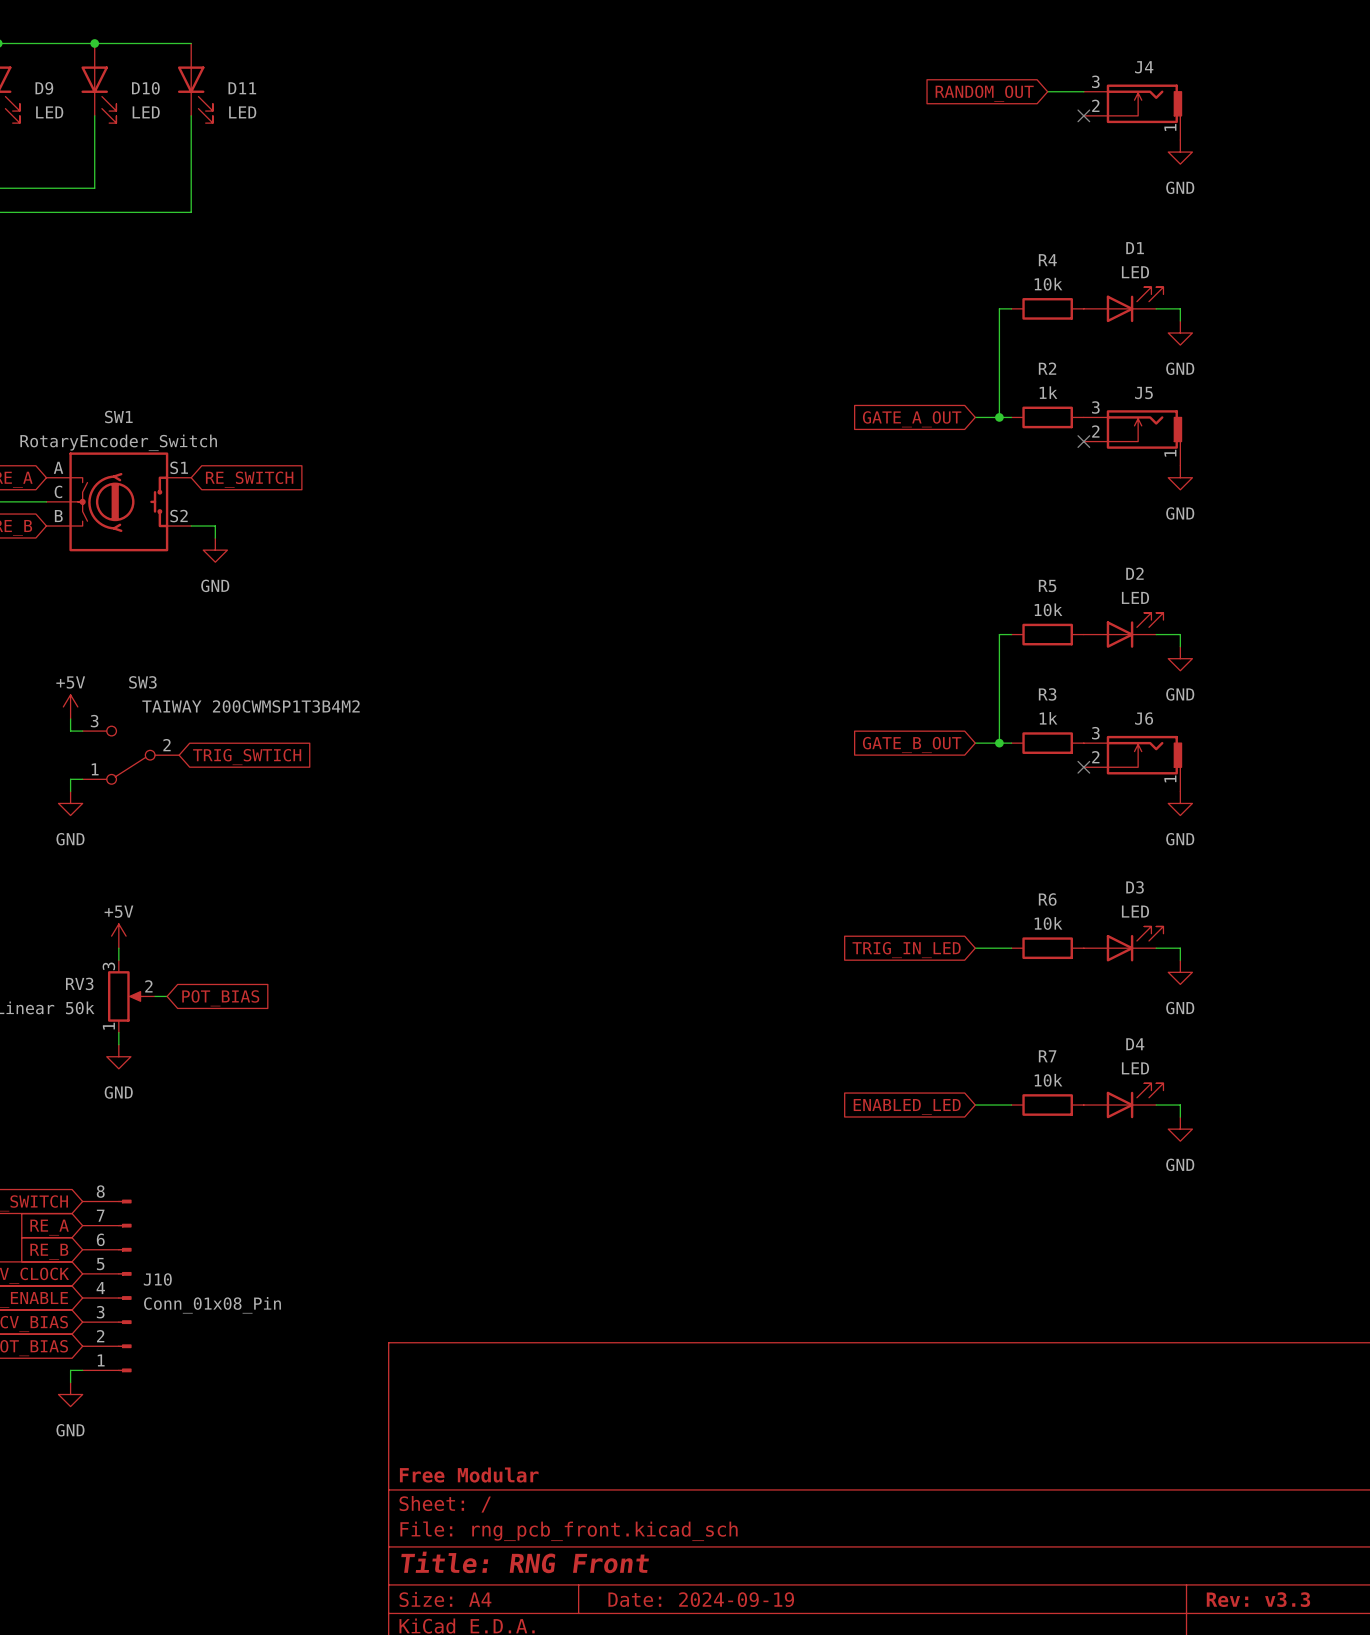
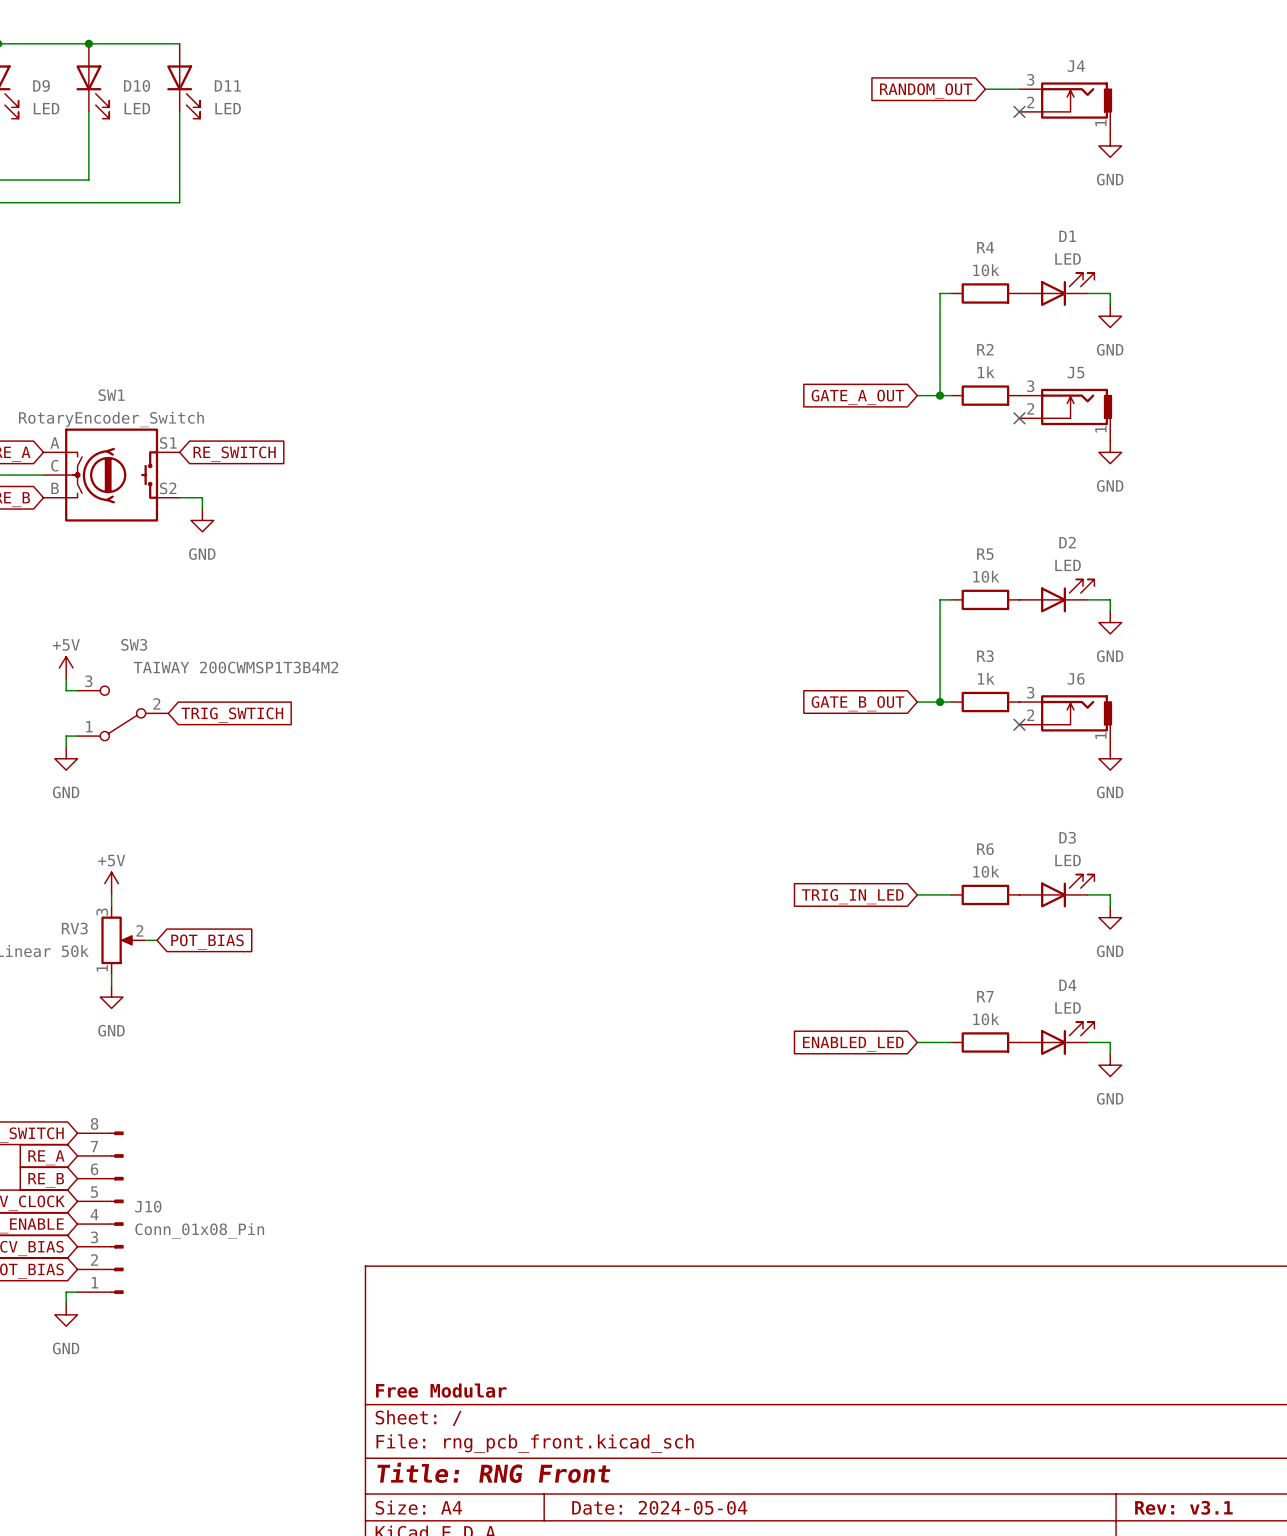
title block: Date: 2024-09-19 (701, 1599) -> Date: 2024-05-04 (659, 1507)
title block: Rev: v3.3 (1258, 1599) -> Rev: v3.1 (1183, 1507)

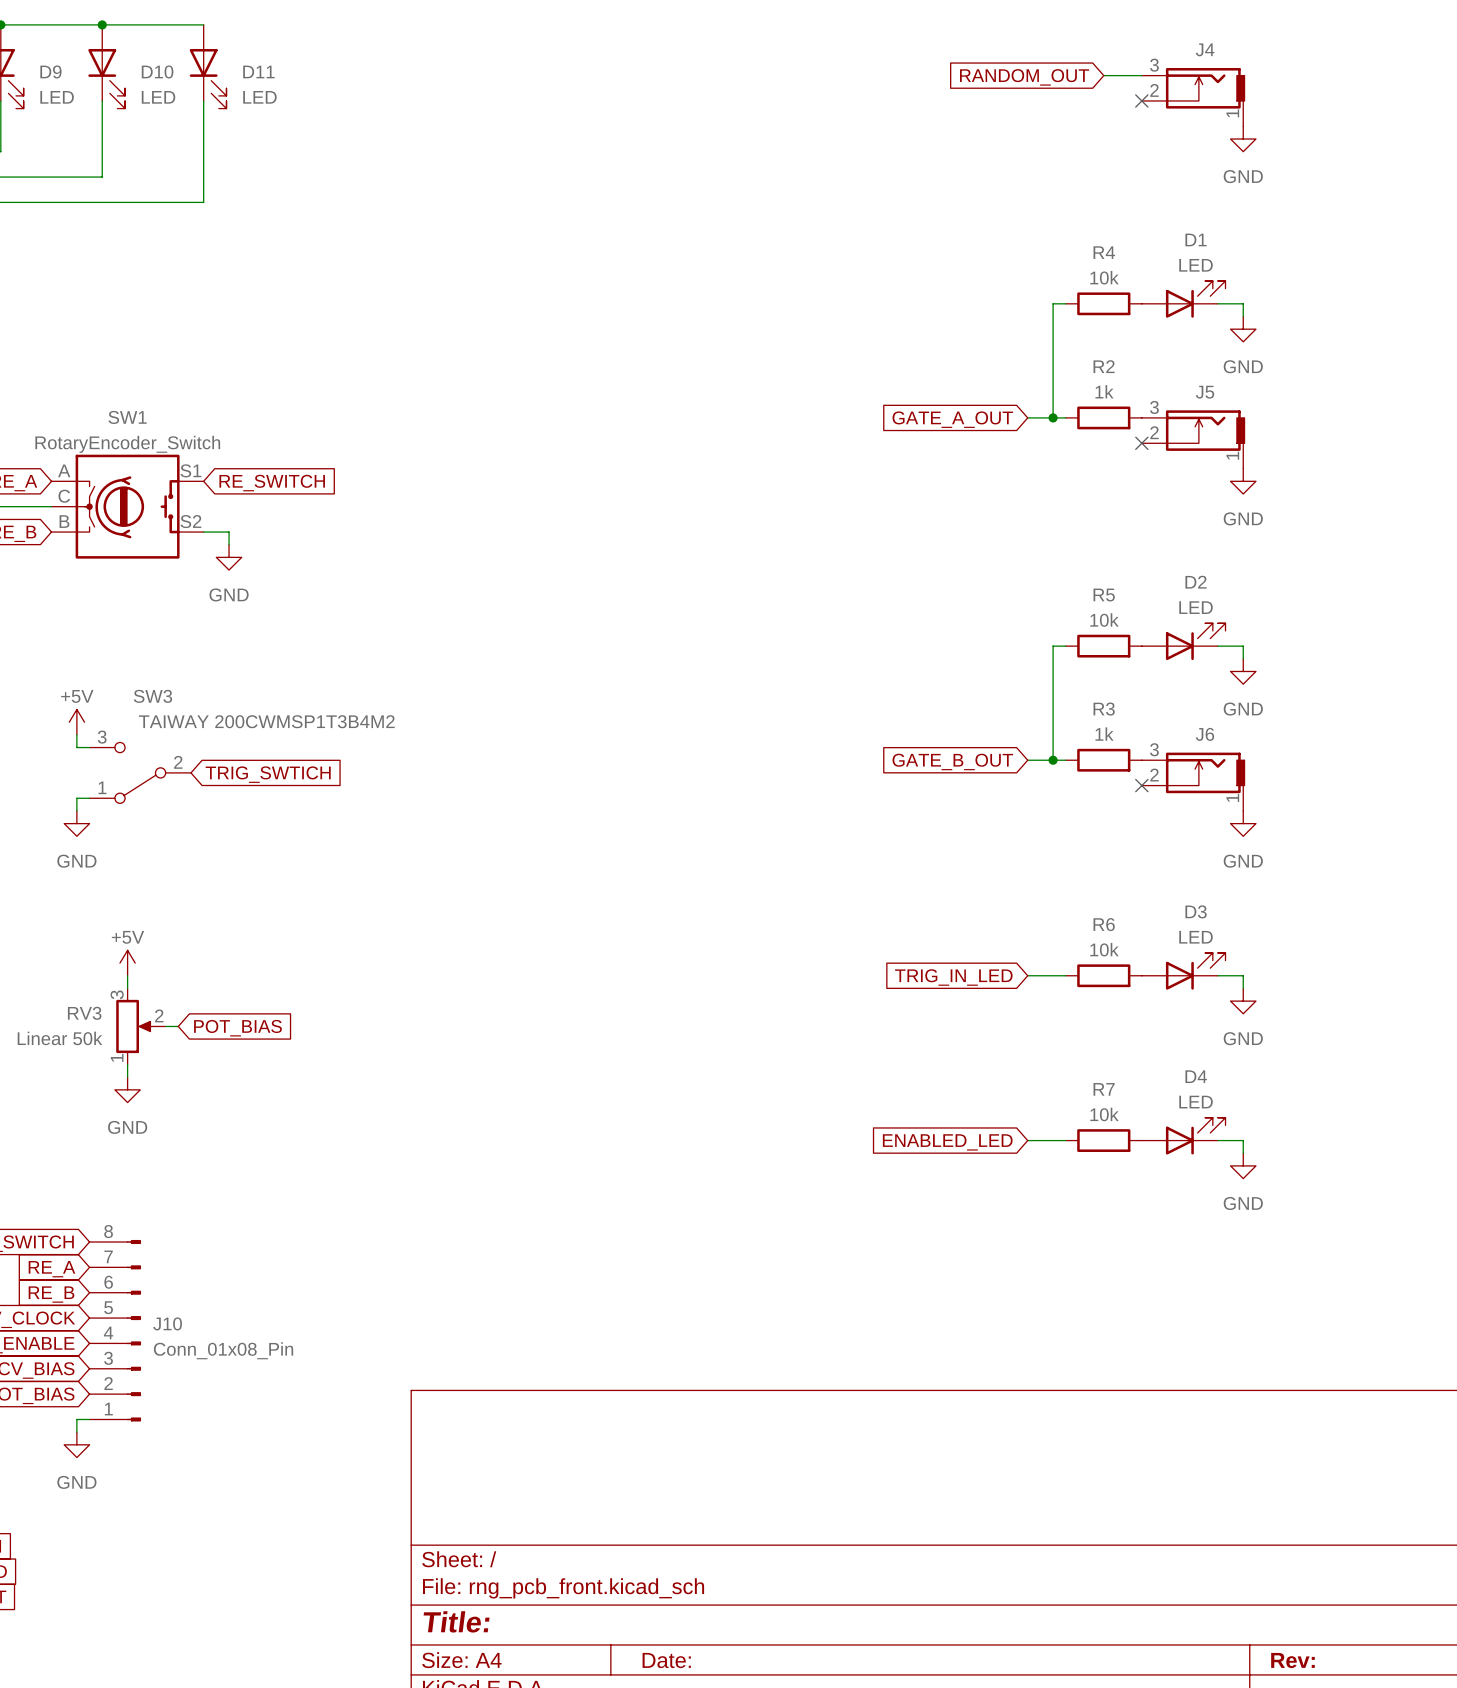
title block: Free Modular (441, 1390) -> none
title block: Title: RNG Front (493, 1472) -> Title: (456, 1621)
title block: Date: 2024-05-04 (659, 1507) -> Date: (666, 1660)
title block: Rev: v3.1 (1183, 1507) -> Rev: (1292, 1660)

